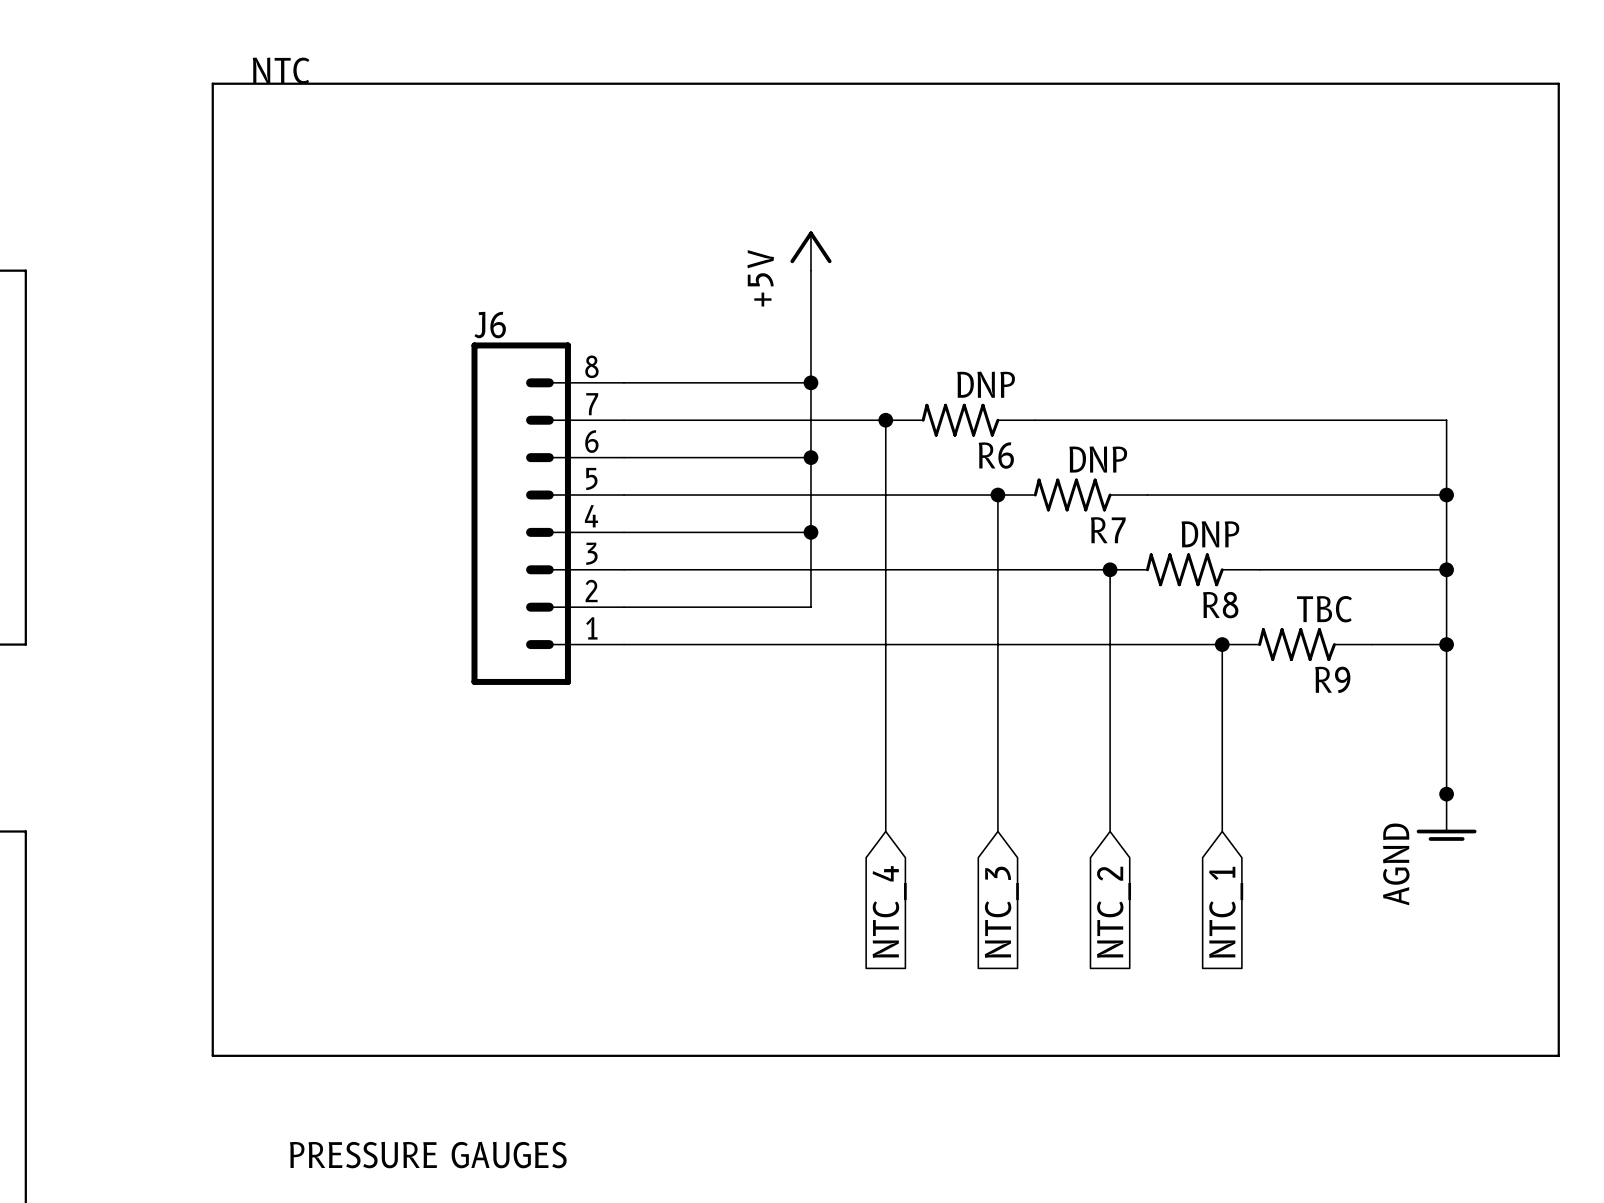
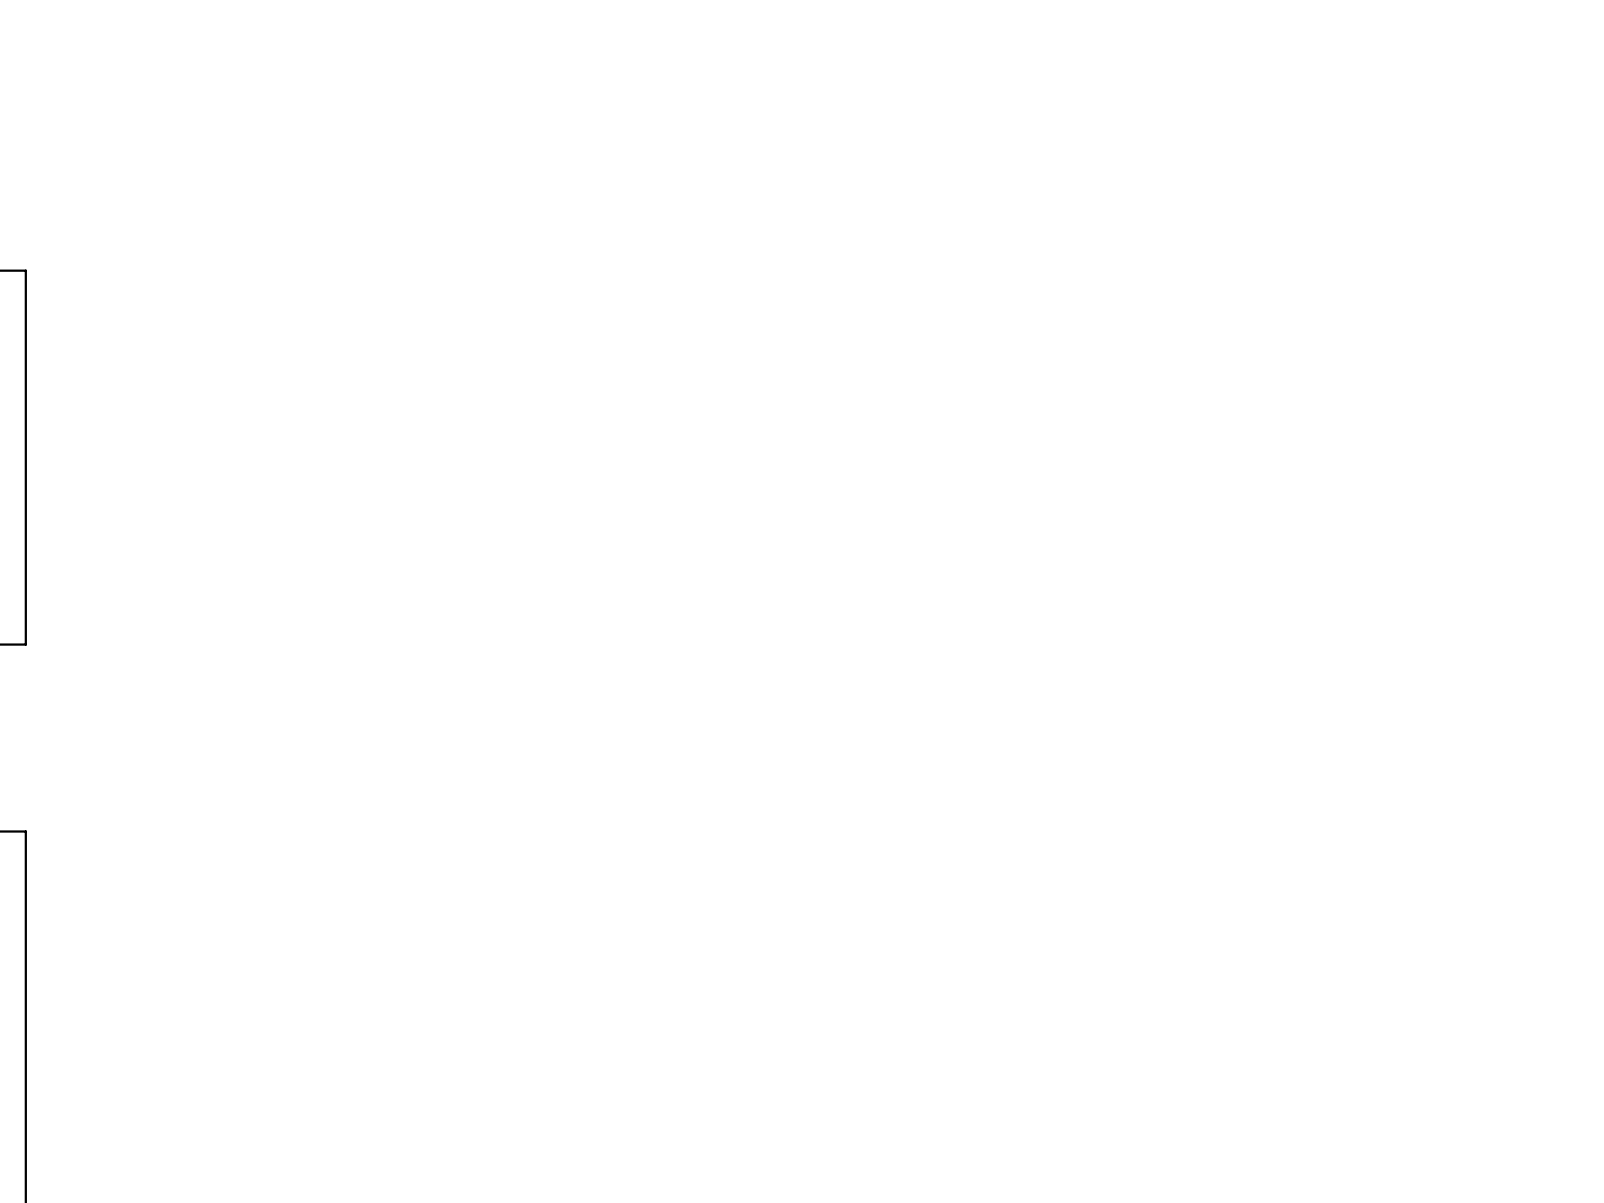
text: NTC (281, 70) -> none
line: (212, 83) (1558, 83) (1558, 1055) (212, 1055) (212, 83) -> none
power symbol: +5V (810, 251) -> none
wire: (810, 270) (810, 607) (624, 607) -> none
wire: (624, 382) (810, 382) -> none
junction: (810, 382) -> none
wire: (624, 420) (885, 420) (885, 831) -> none
junction: (885, 420) -> none
R6: DNP (960, 420) -> none
wire: (1035, 420) (1446, 420) (1446, 794) -> none
wire: (624, 457) (810, 457) -> none
junction: (810, 457) -> none
wire: (624, 495) (997, 495) (997, 831) -> none
junction: (997, 495) -> none
R7: DNP (1072, 495) -> none
wire: (1147, 495) (1446, 495) -> none
junction: (1446, 495) -> none
J6: (547, 513) -> none
wire: (624, 532) (810, 532) -> none
junction: (810, 532) -> none
wire: (624, 569) (1110, 569) (1110, 831) -> none
junction: (1110, 569) -> none
R8: DNP (1184, 569) -> none
wire: (1259, 569) (1446, 569) -> none
junction: (1446, 569) -> none
wire: (624, 644) (1222, 644) (1222, 831) -> none
junction: (1222, 644) -> none
R9: TBC (1297, 644) -> none
wire: (1371, 644) (1446, 644) -> none
junction: (1446, 644) -> none
junction: (1446, 794) -> none
power symbol: AGND (1446, 817) -> none
global label: NTC_4 (889, 911) -> none
global label: NTC_3 (1001, 912) -> none
global label: NTC_2 (1114, 912) -> none
global label: NTC_1 (1226, 912) -> none
text: PRESSURE GAUGES (428, 1155) -> none

